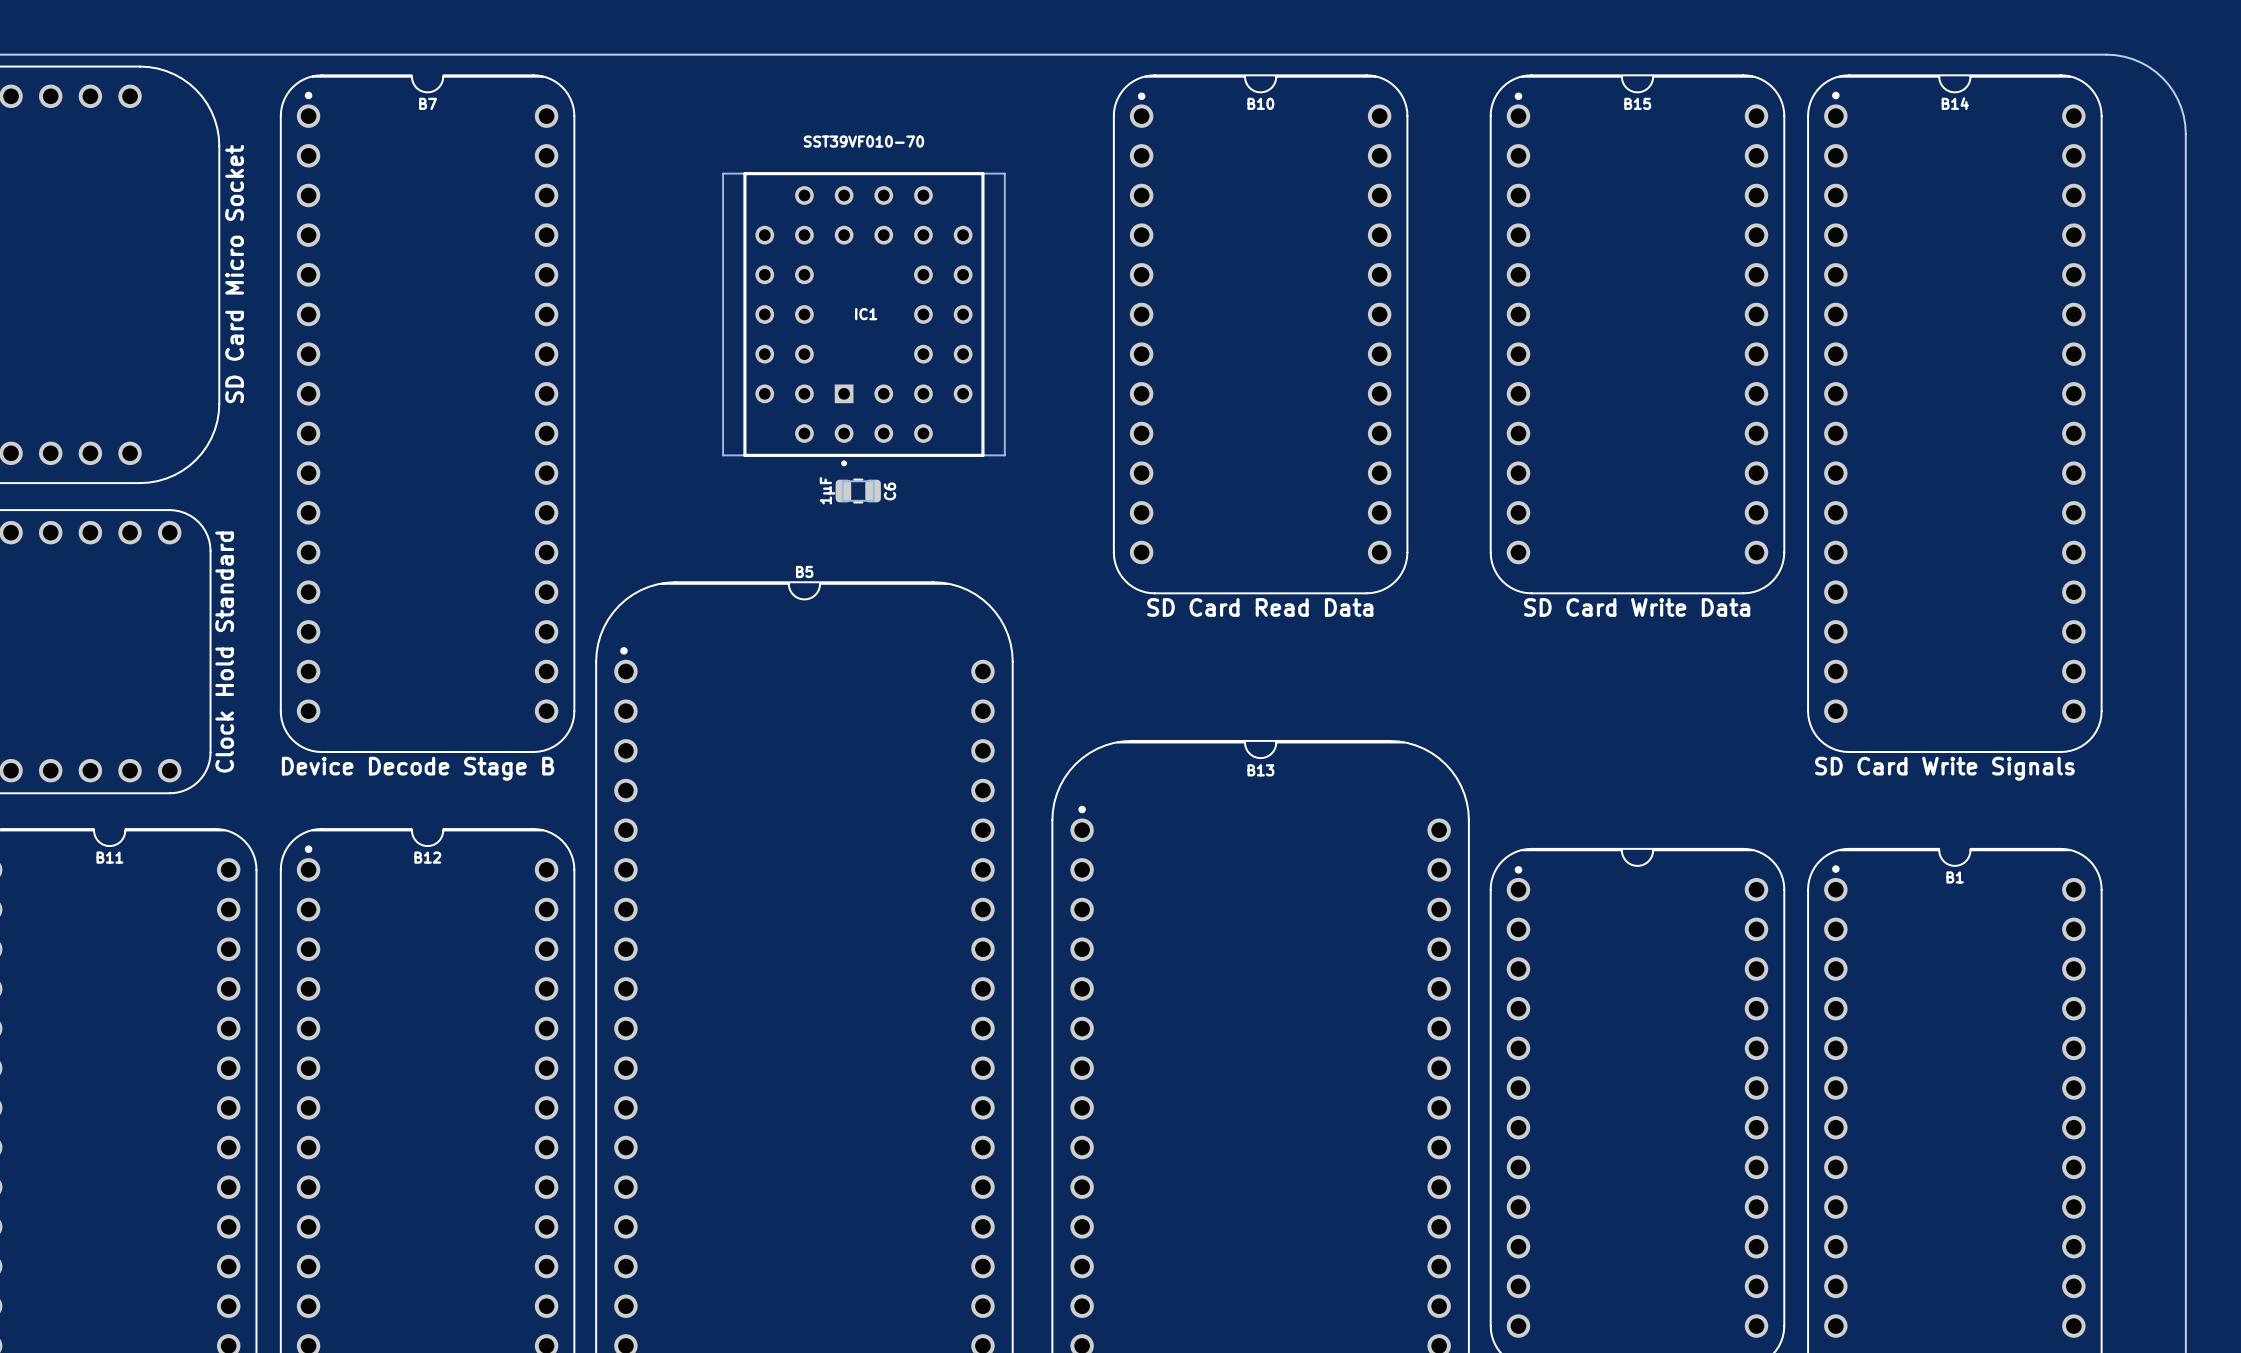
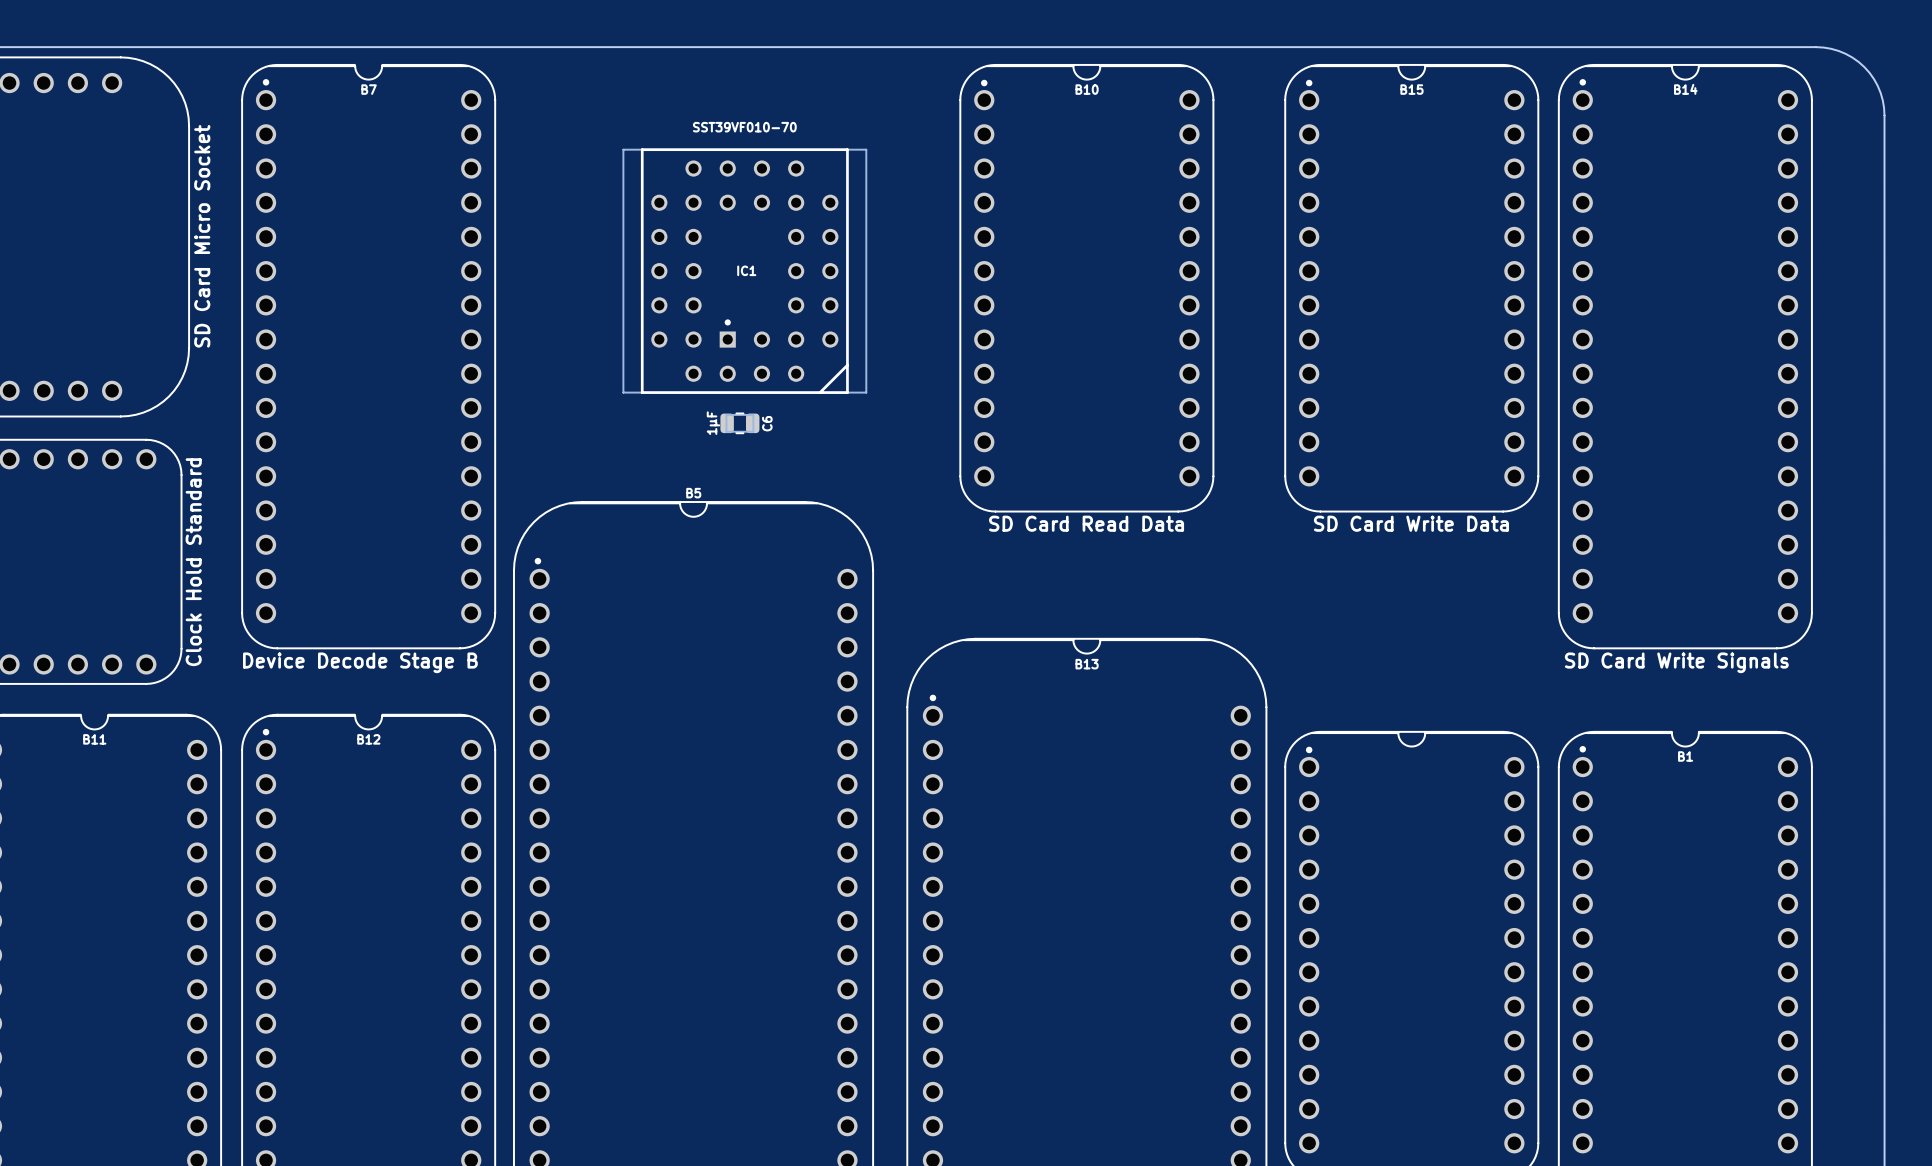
IC1 footprint: [722, 172, 1006, 467] -> [622, 148, 867, 394]

